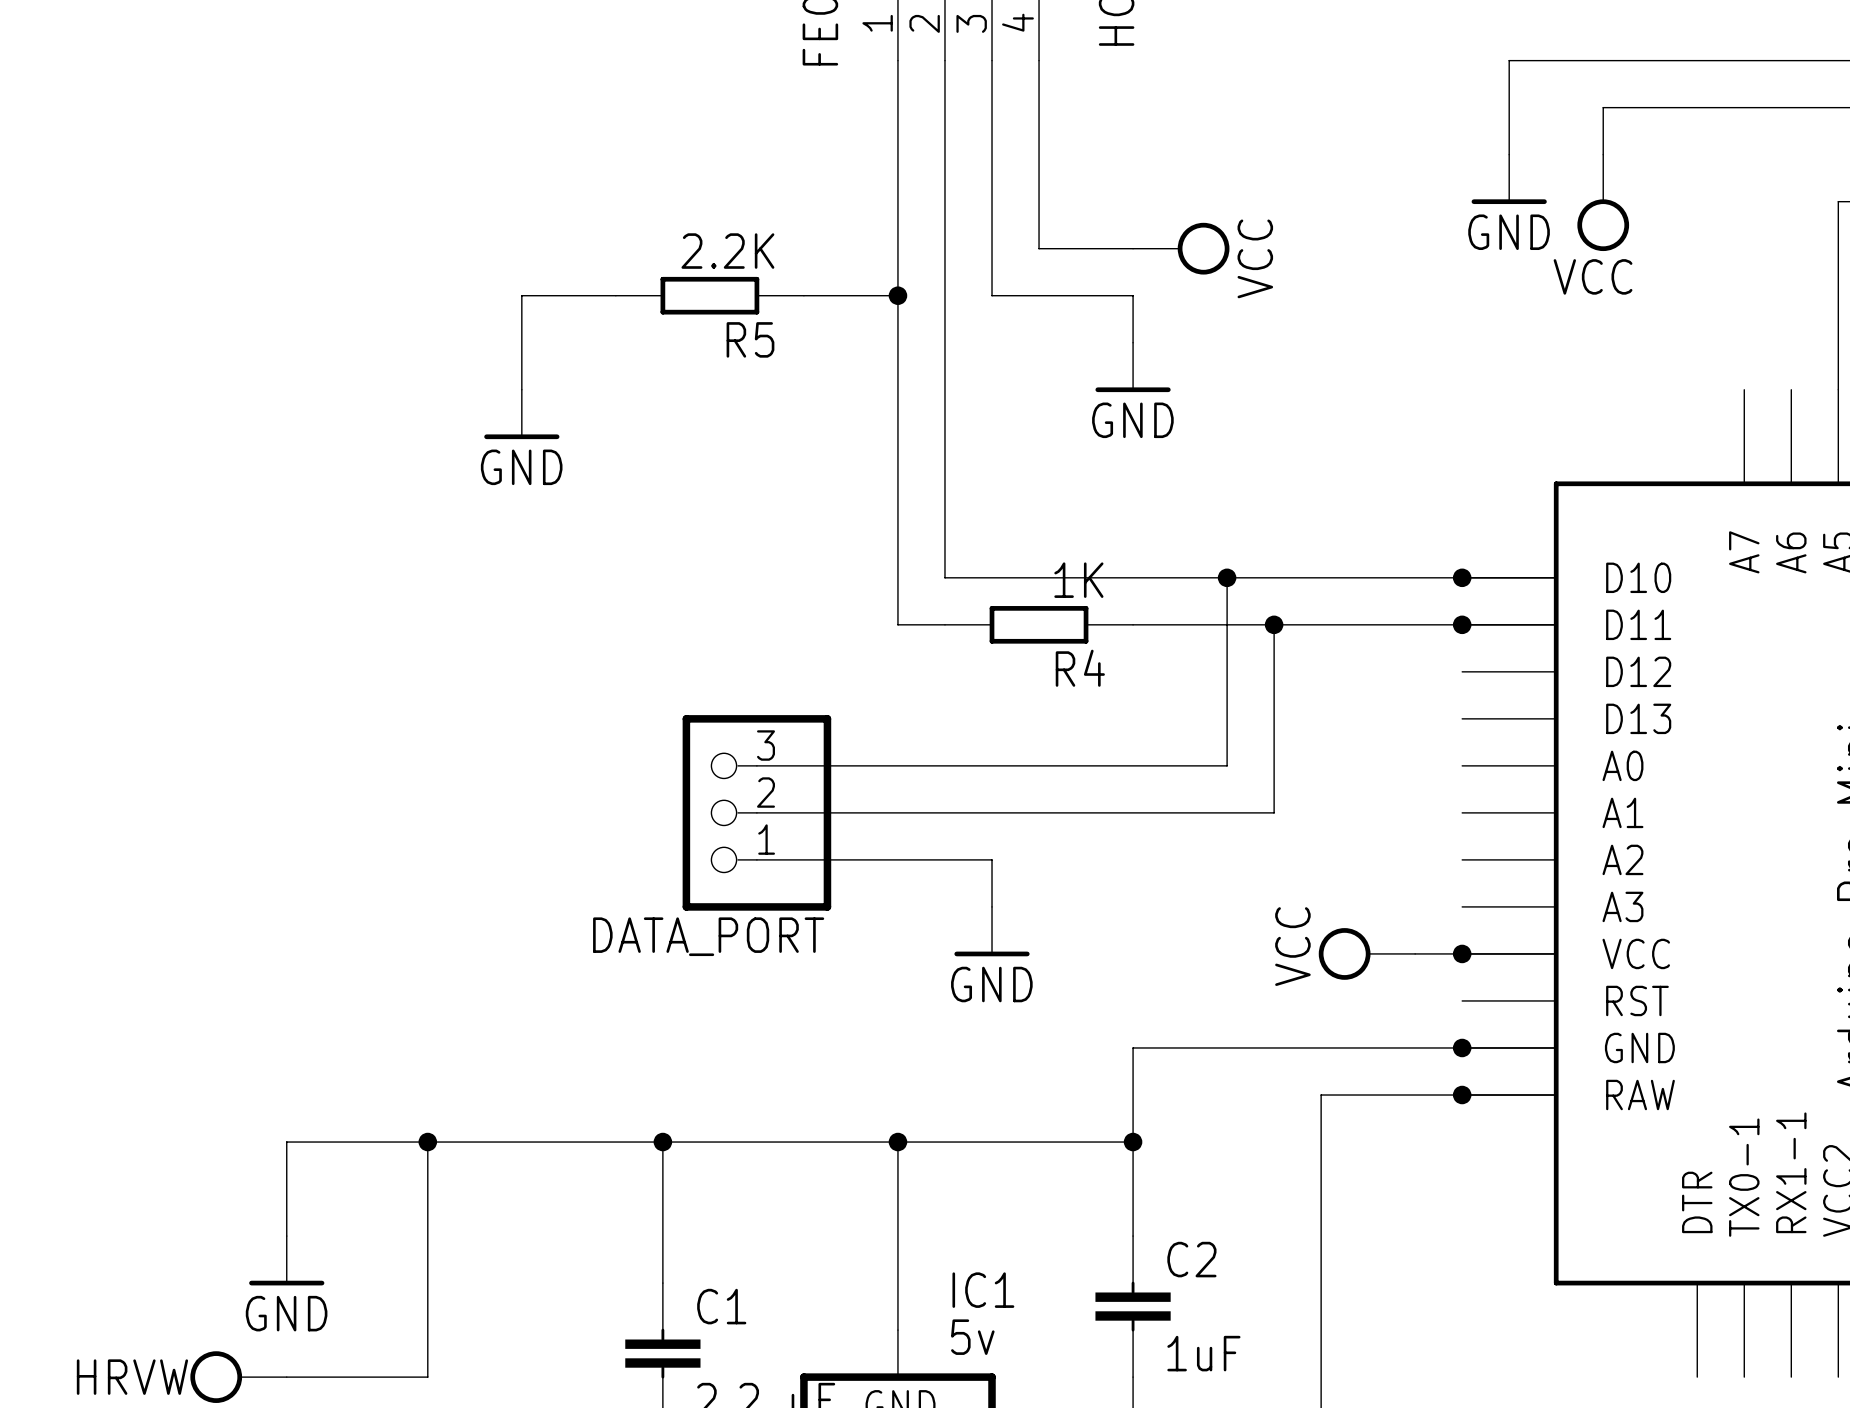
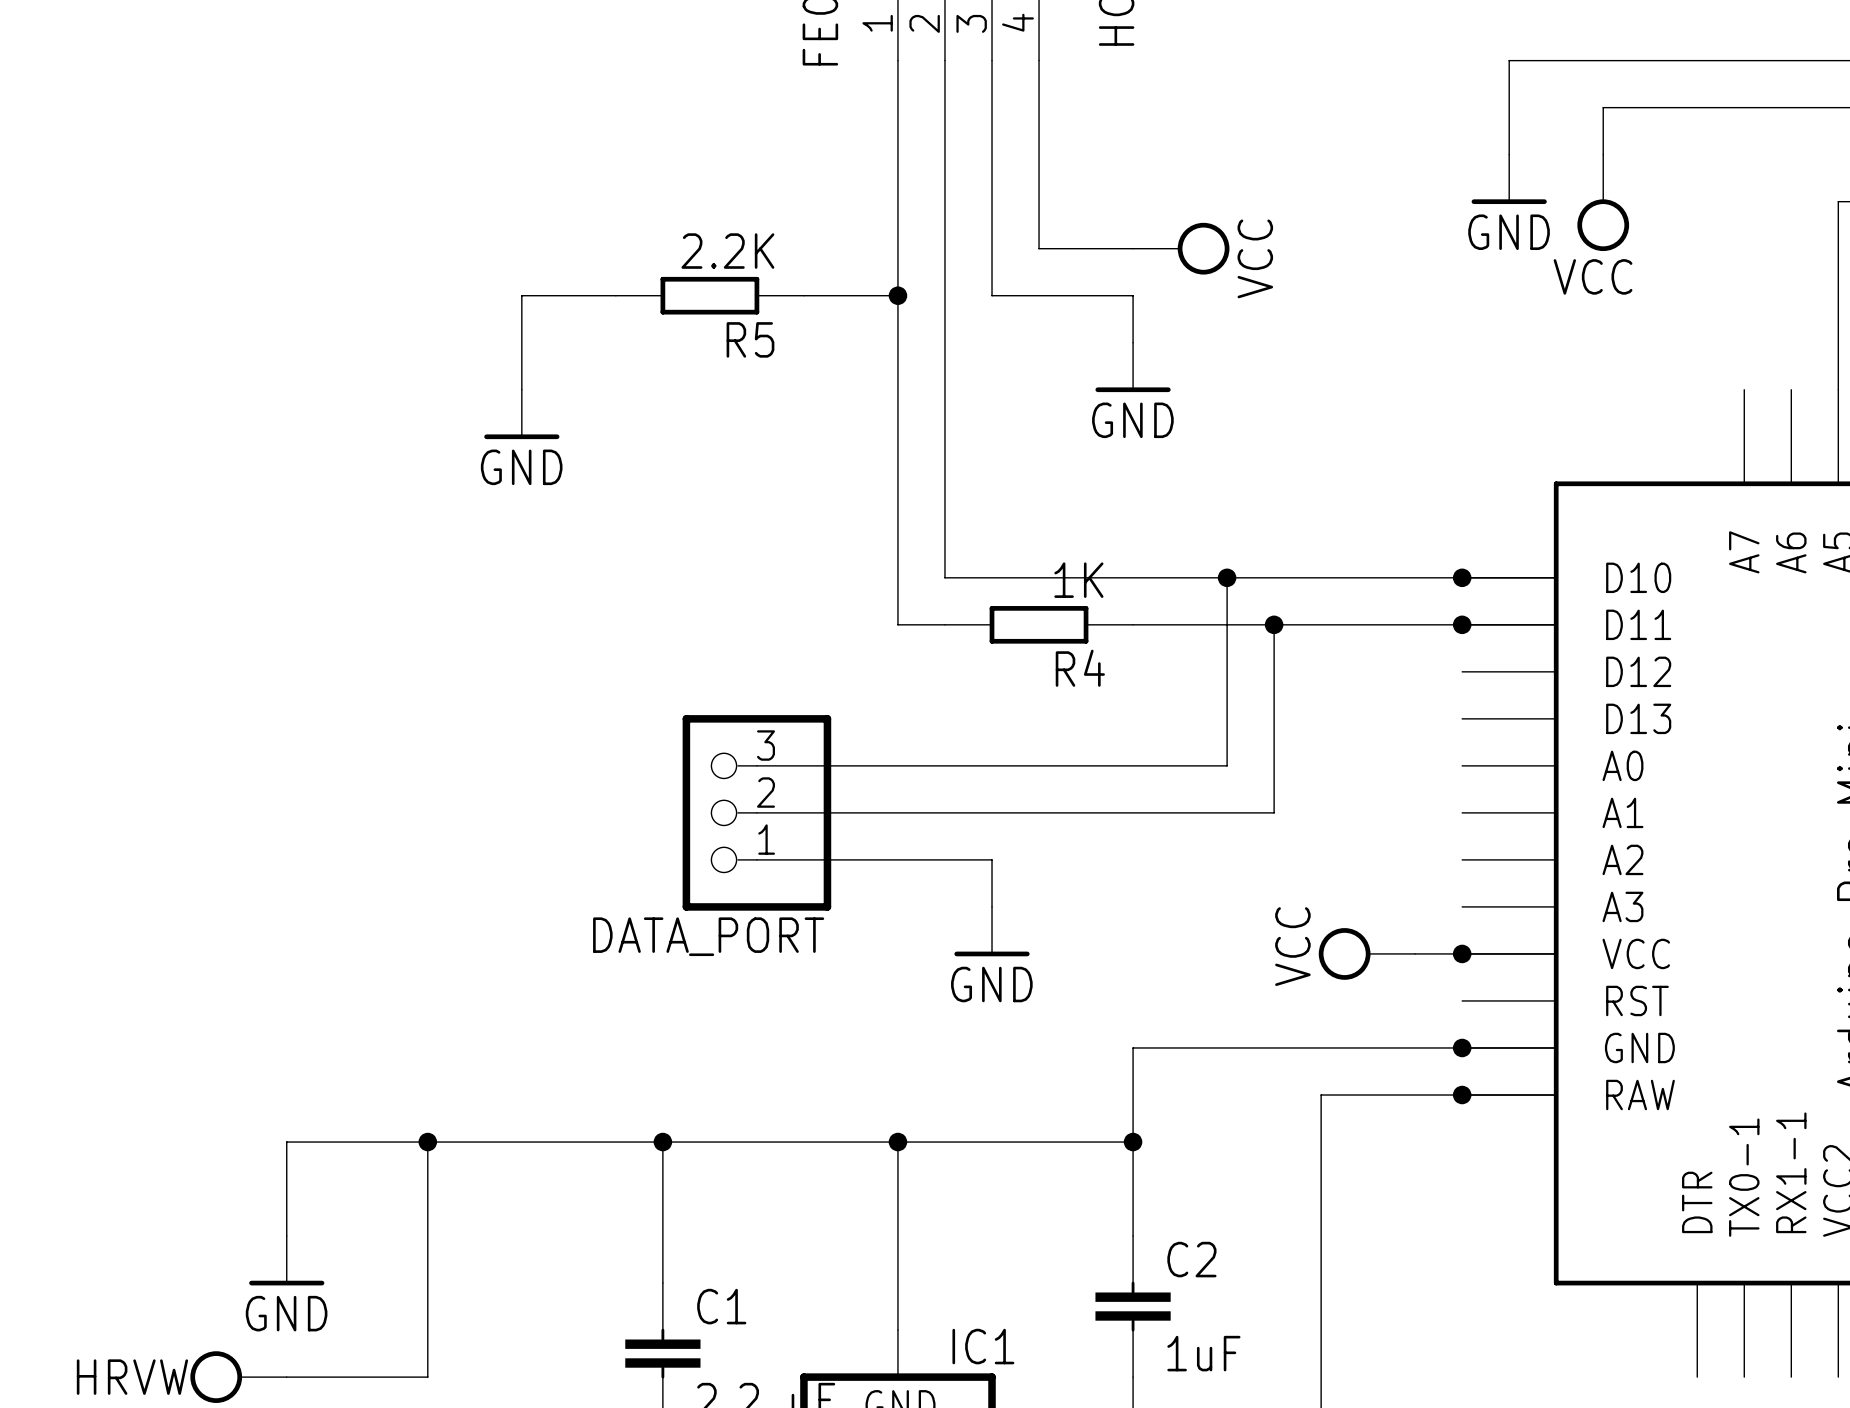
IC1 name position: IC1 (983, 1290) -> IC1 (983, 1346)
IC1 value: 5v (972, 1337) -> none

